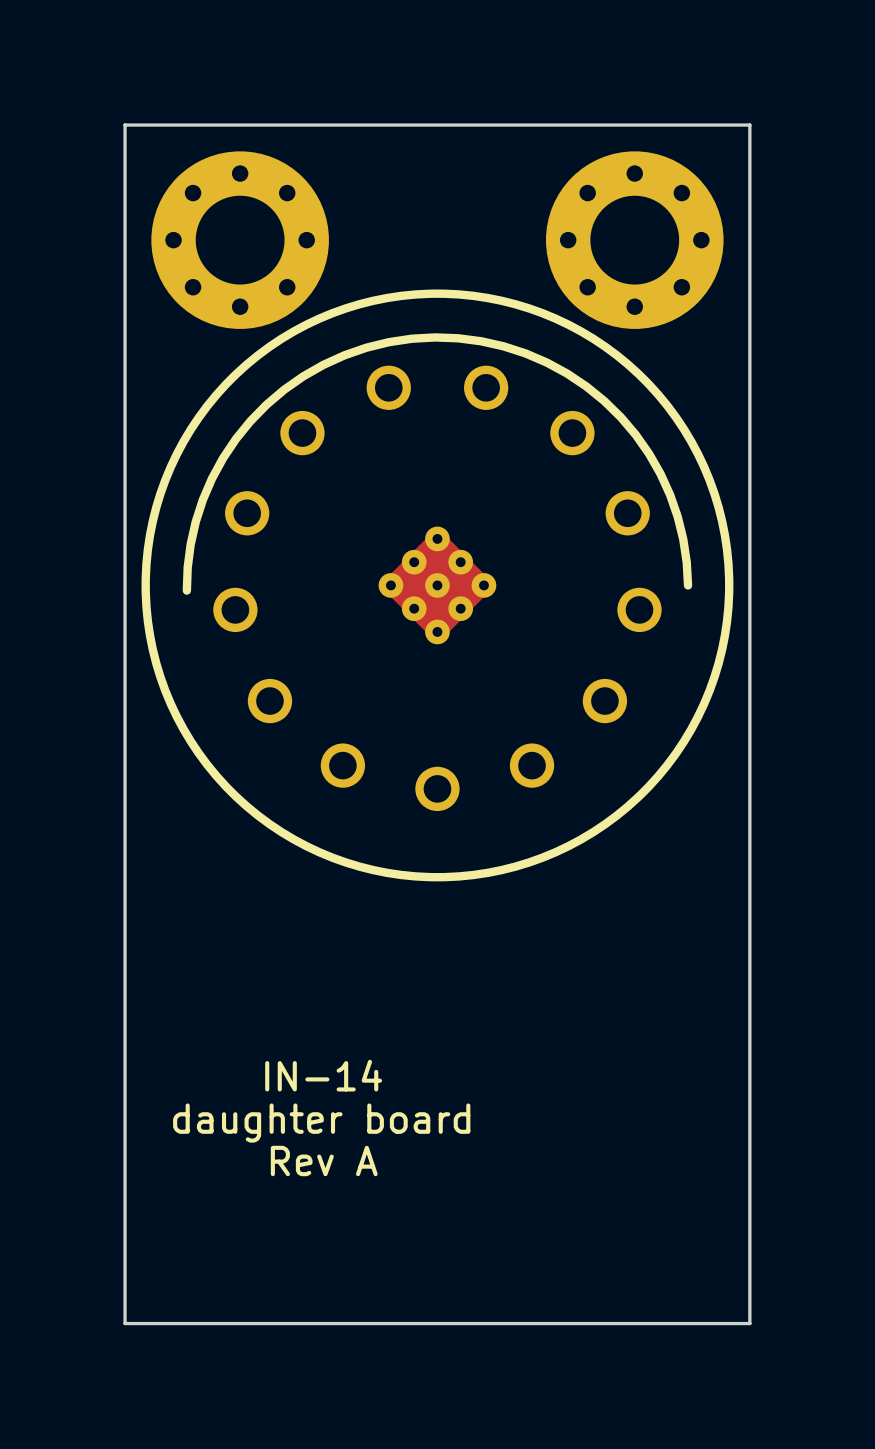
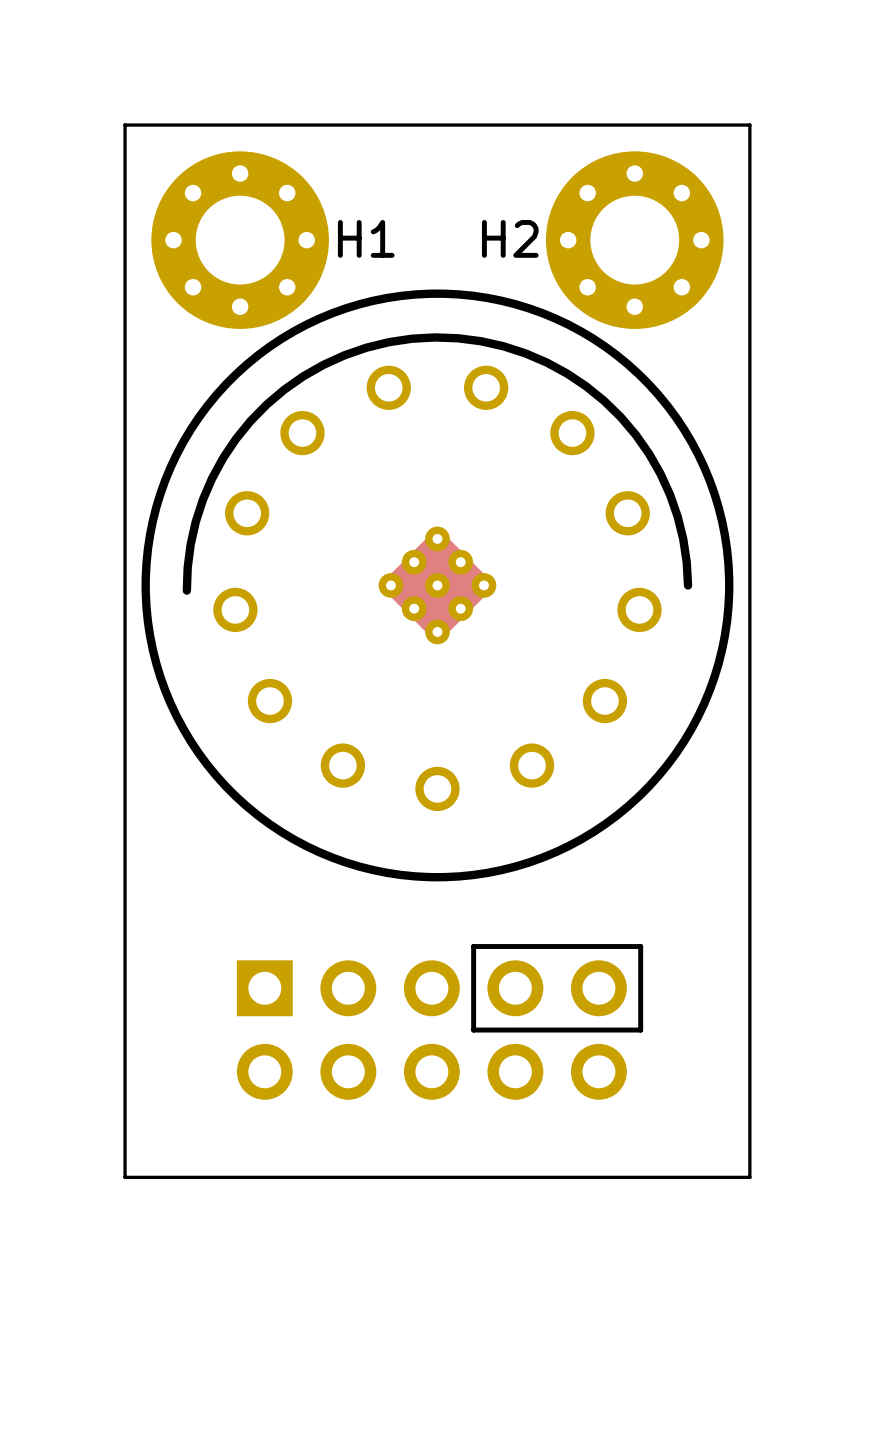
H1 name: none -> H1 (366, 238)
H2 name: none -> H2 (510, 238)
line: none -> (473, 946) (640, 946) (640, 1030) (473, 1030) (473, 946)
part: none -> (431, 1030)
text: IN-14 (323, 1075) -> none
text: daughter board (321, 1123) -> none
text: Rev A (324, 1161) -> none
board edge: (125, 1177) (125, 1323) (749, 1323) (749, 1177) -> (125, 1177) (749, 1177)

